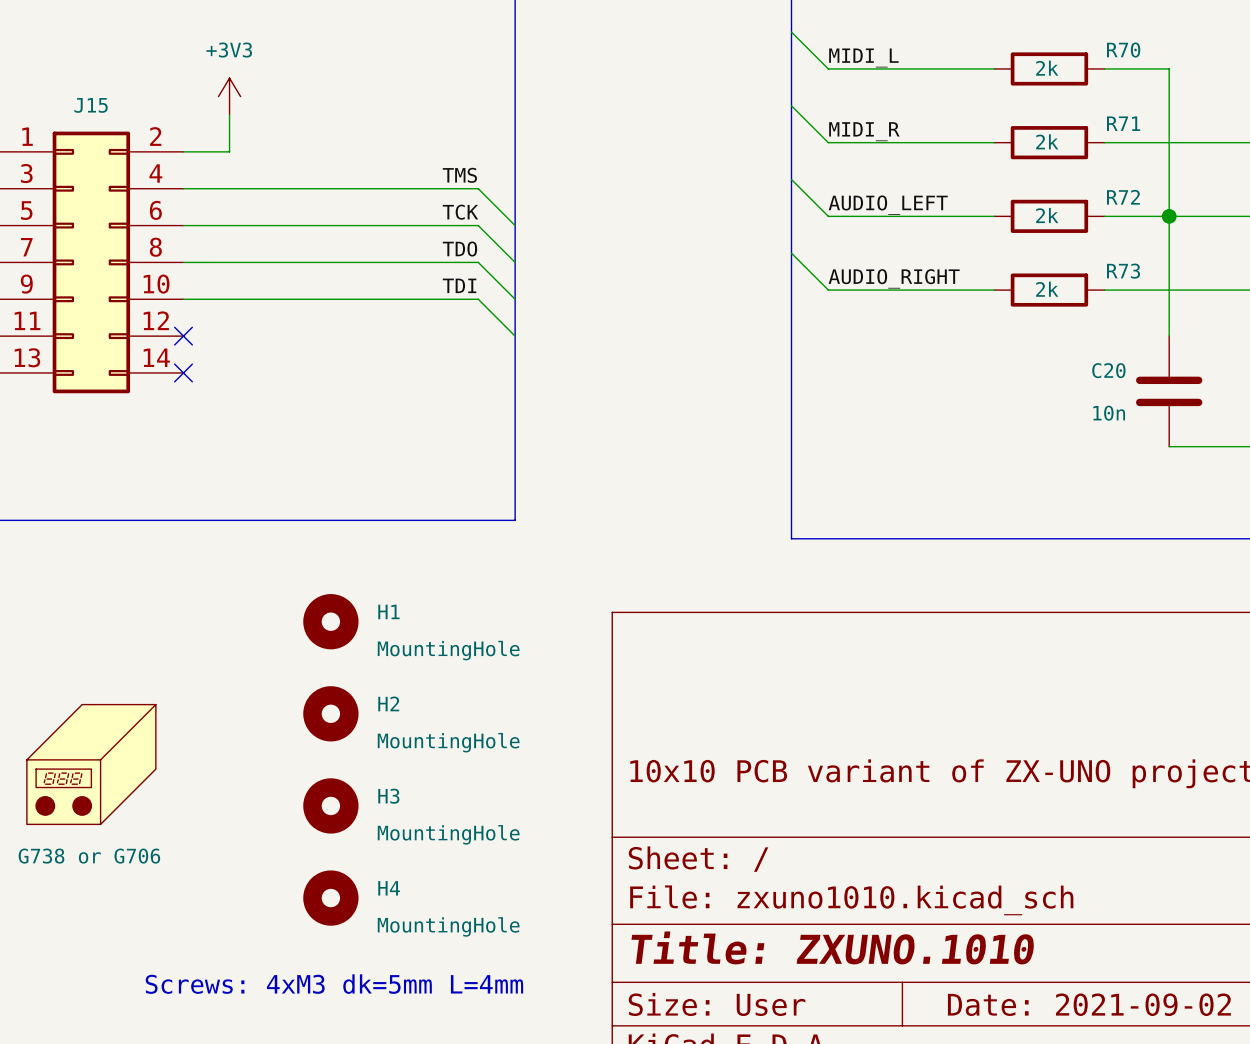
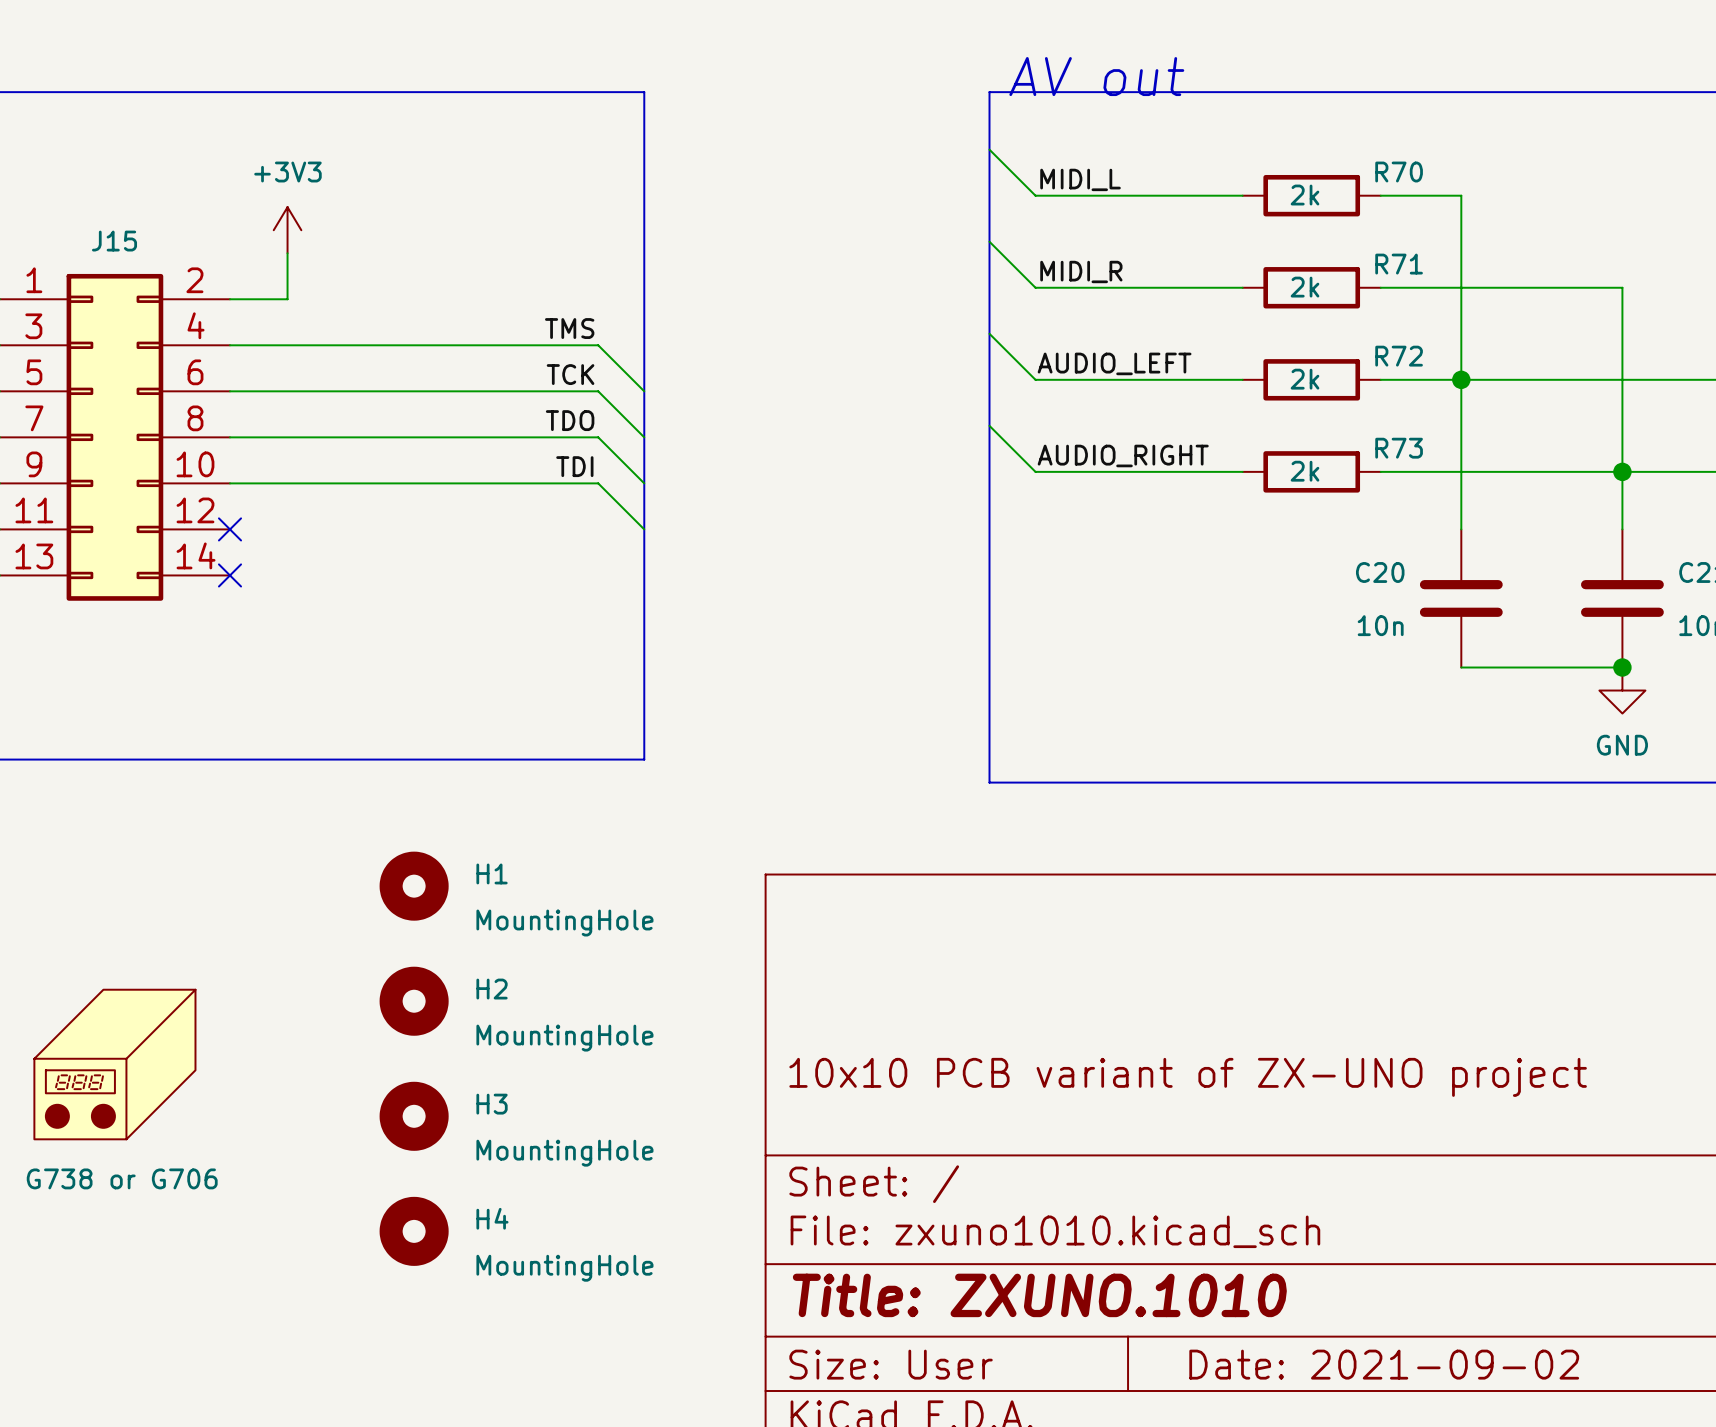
text: Screws: 4xM3 dk=5mm L=4mm (334, 984) -> none

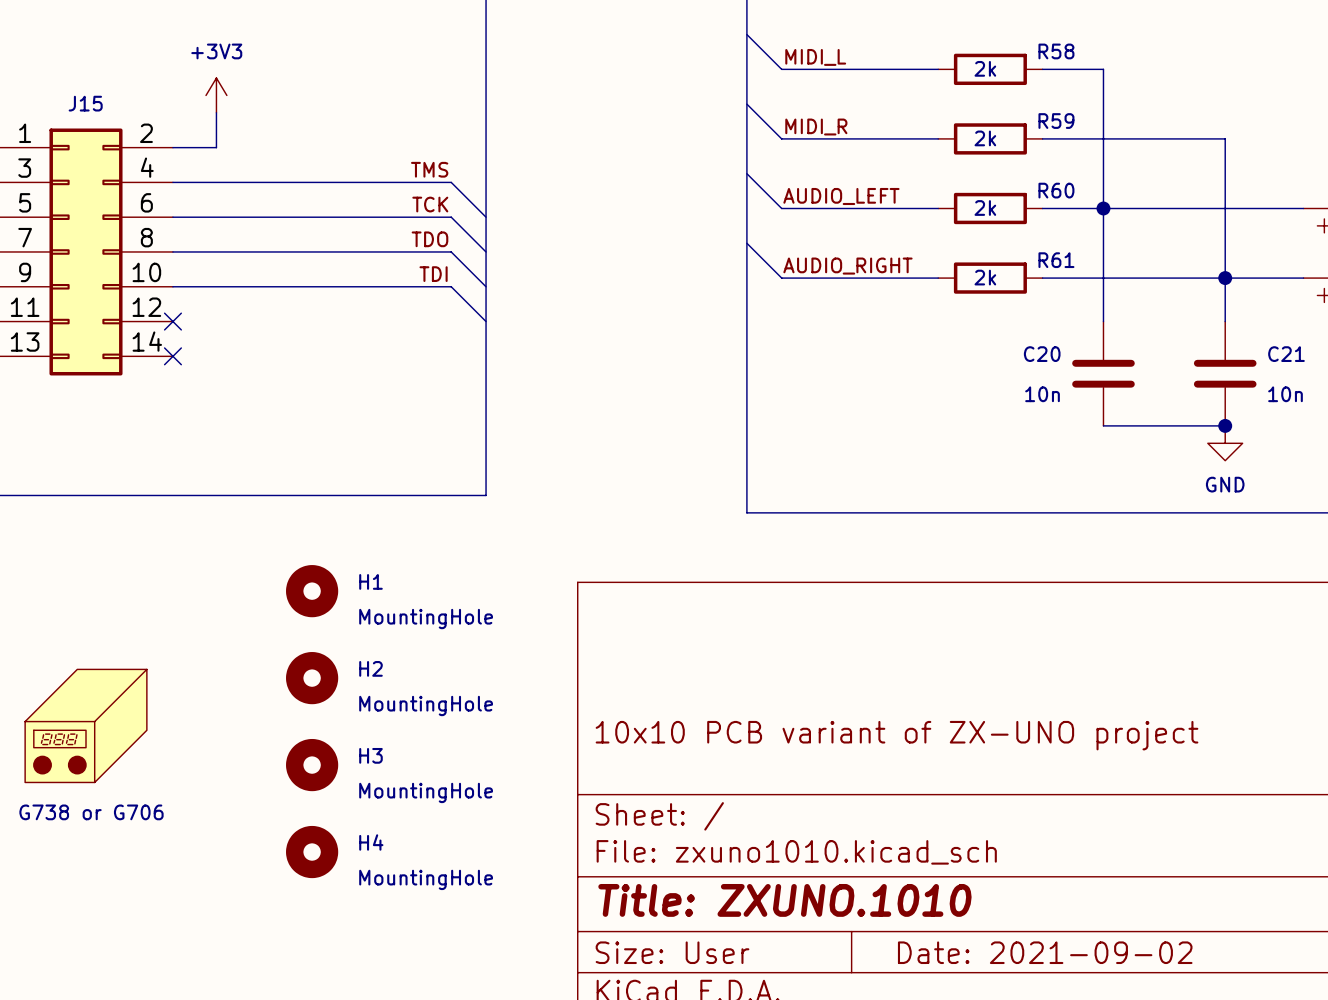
R70 name: R70 (1399, 172) -> R58 (1056, 51)
R71 name: R71 (1399, 264) -> R59 (1056, 121)
R72 name: R72 (1399, 356) -> R60 (1056, 190)
R73 name: R73 (1399, 448) -> R61 (1056, 260)

